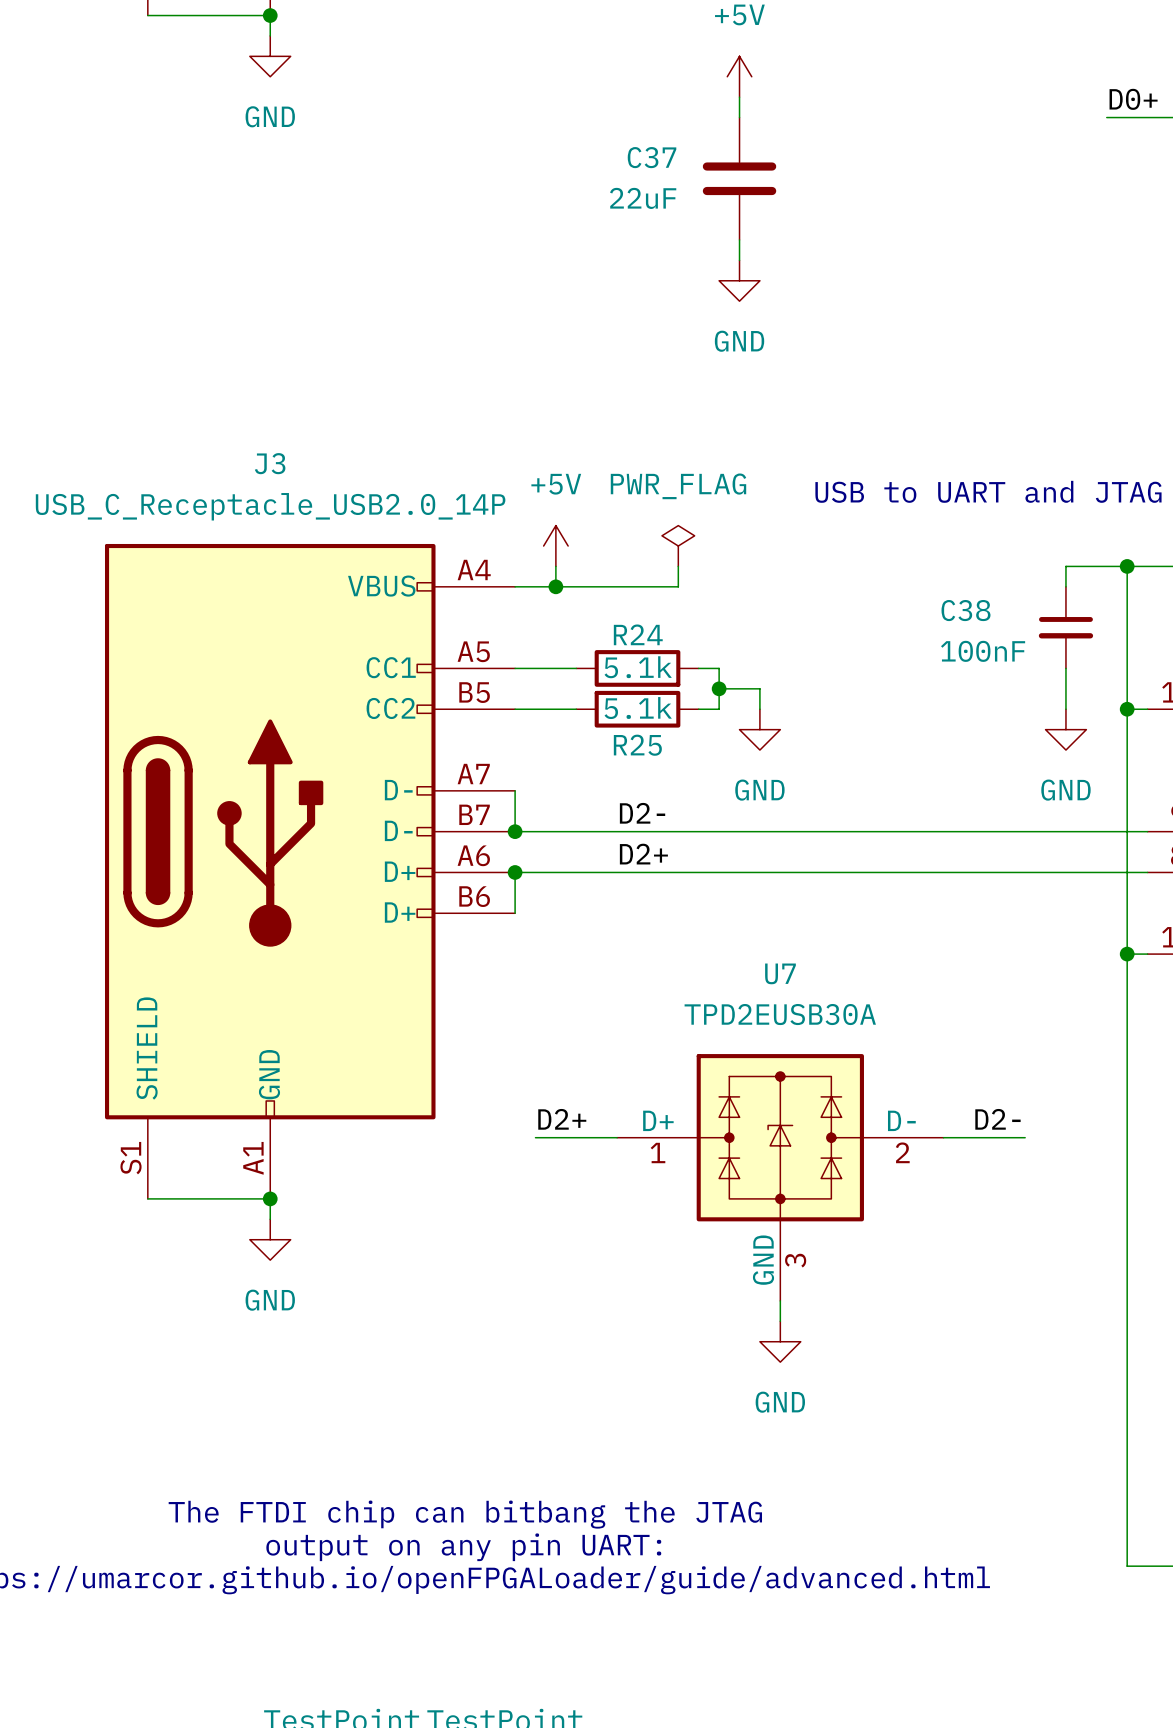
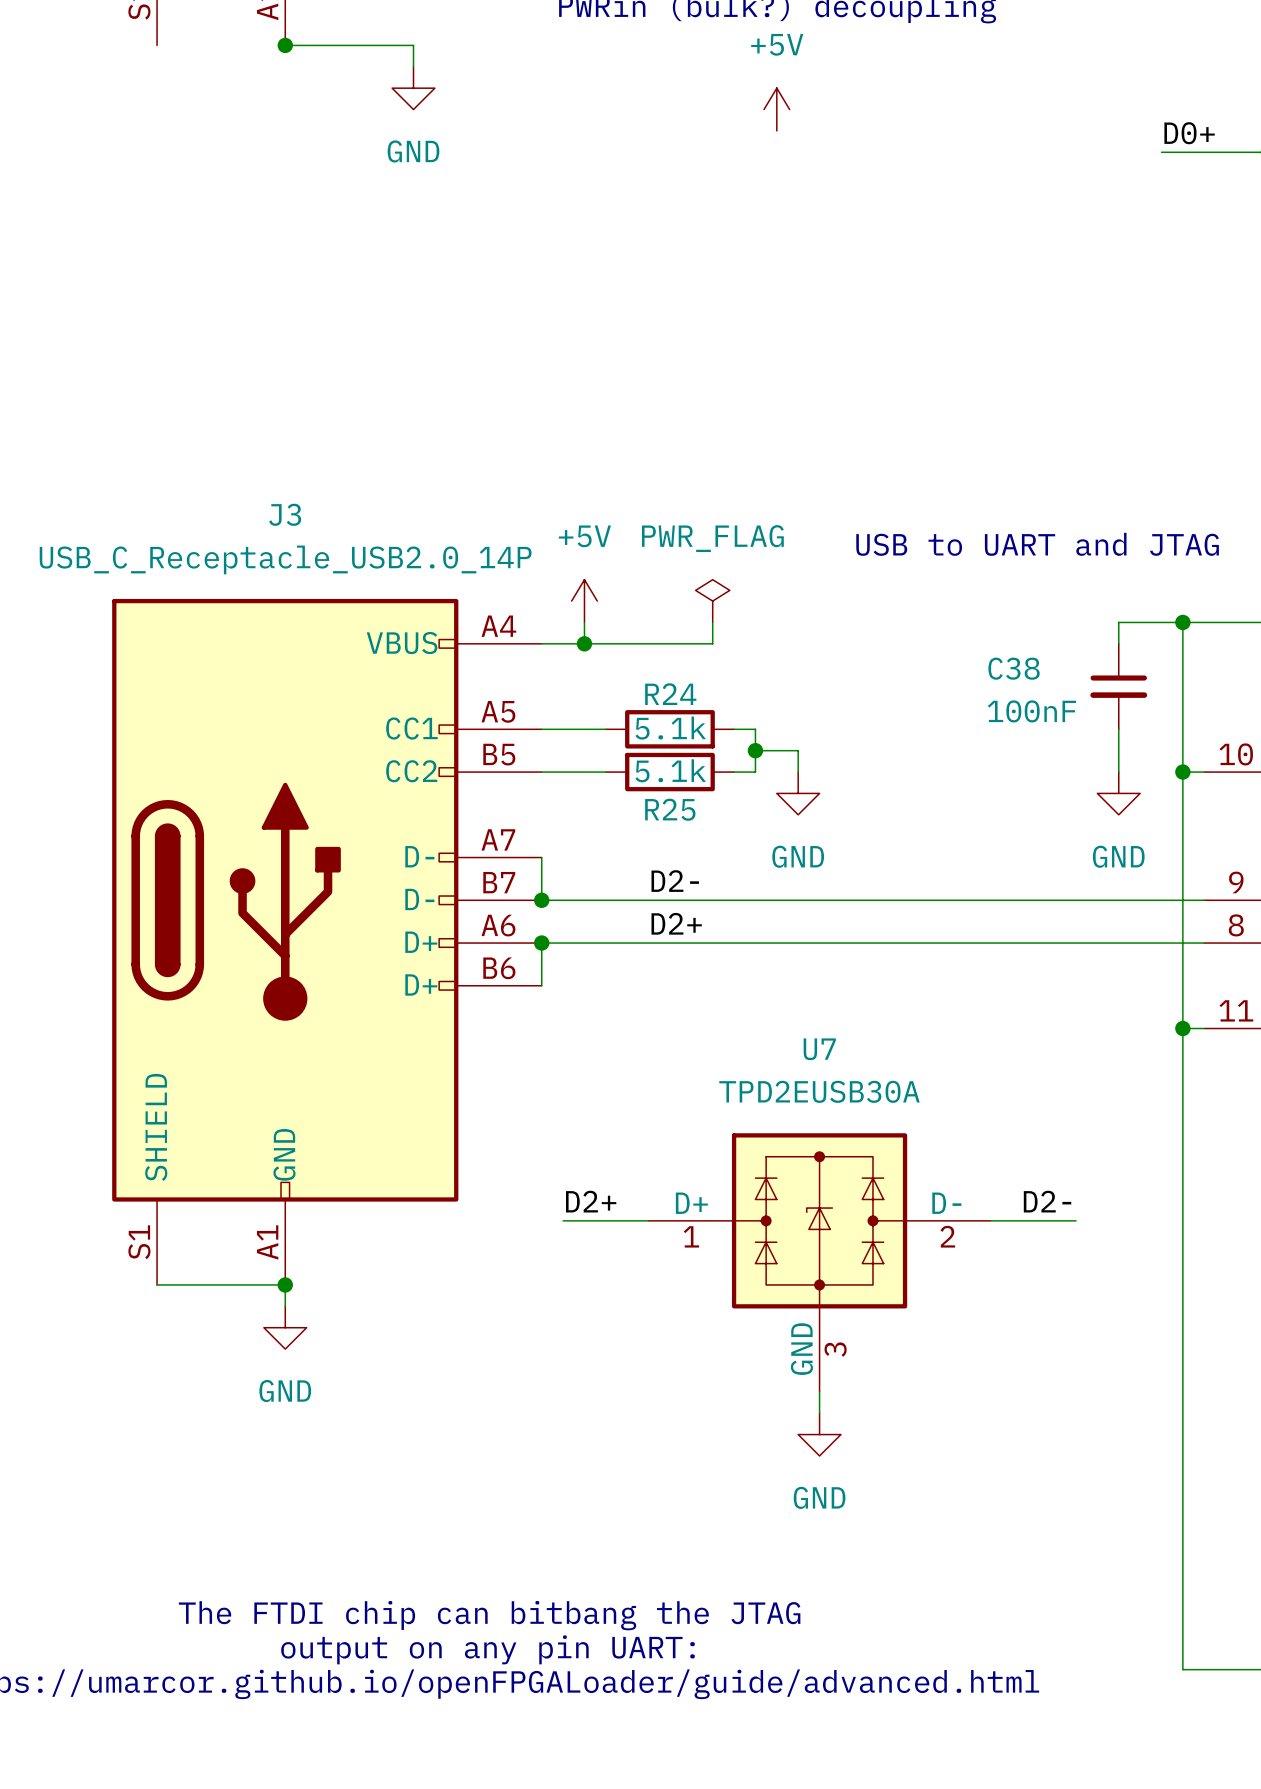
wire: (147, 15) (270, 15) (270, 35) -> (285, 45) (413, 45) (413, 66)
power symbol position: GND (270, 56) -> GND (413, 88)
wire: (739, 97) (739, 117) -> none
C37: 22uF (739, 178) -> none
wire: (739, 239) (739, 260) -> none
power symbol: GND (739, 280) -> none

